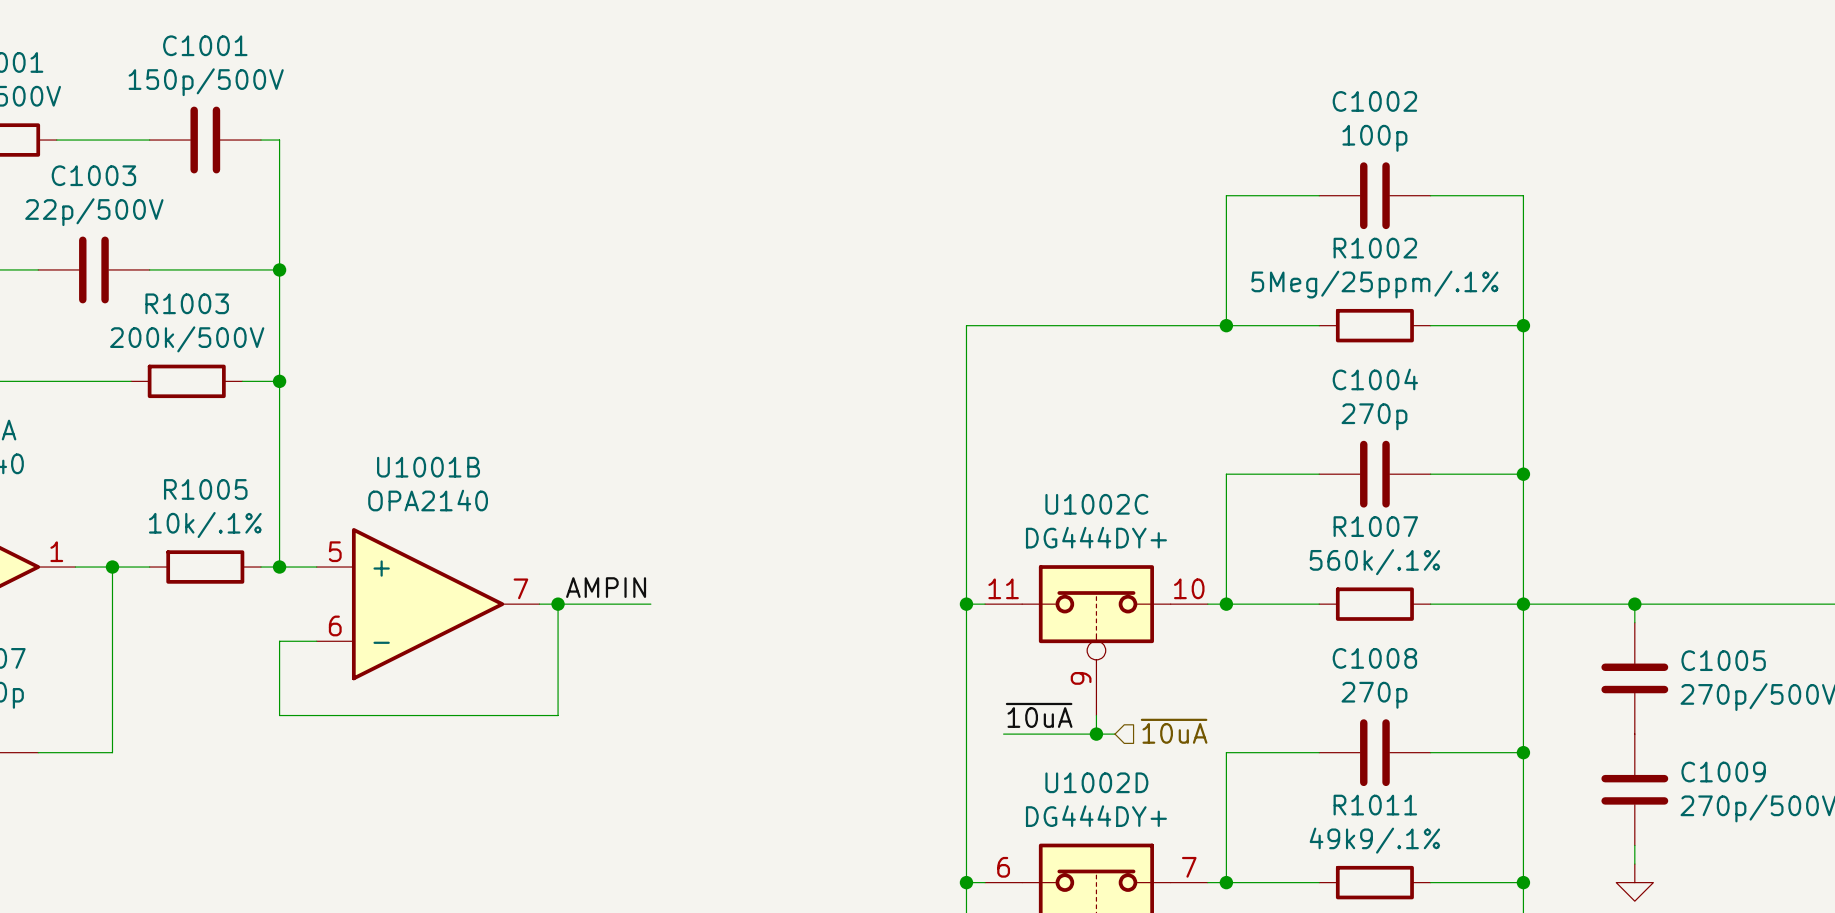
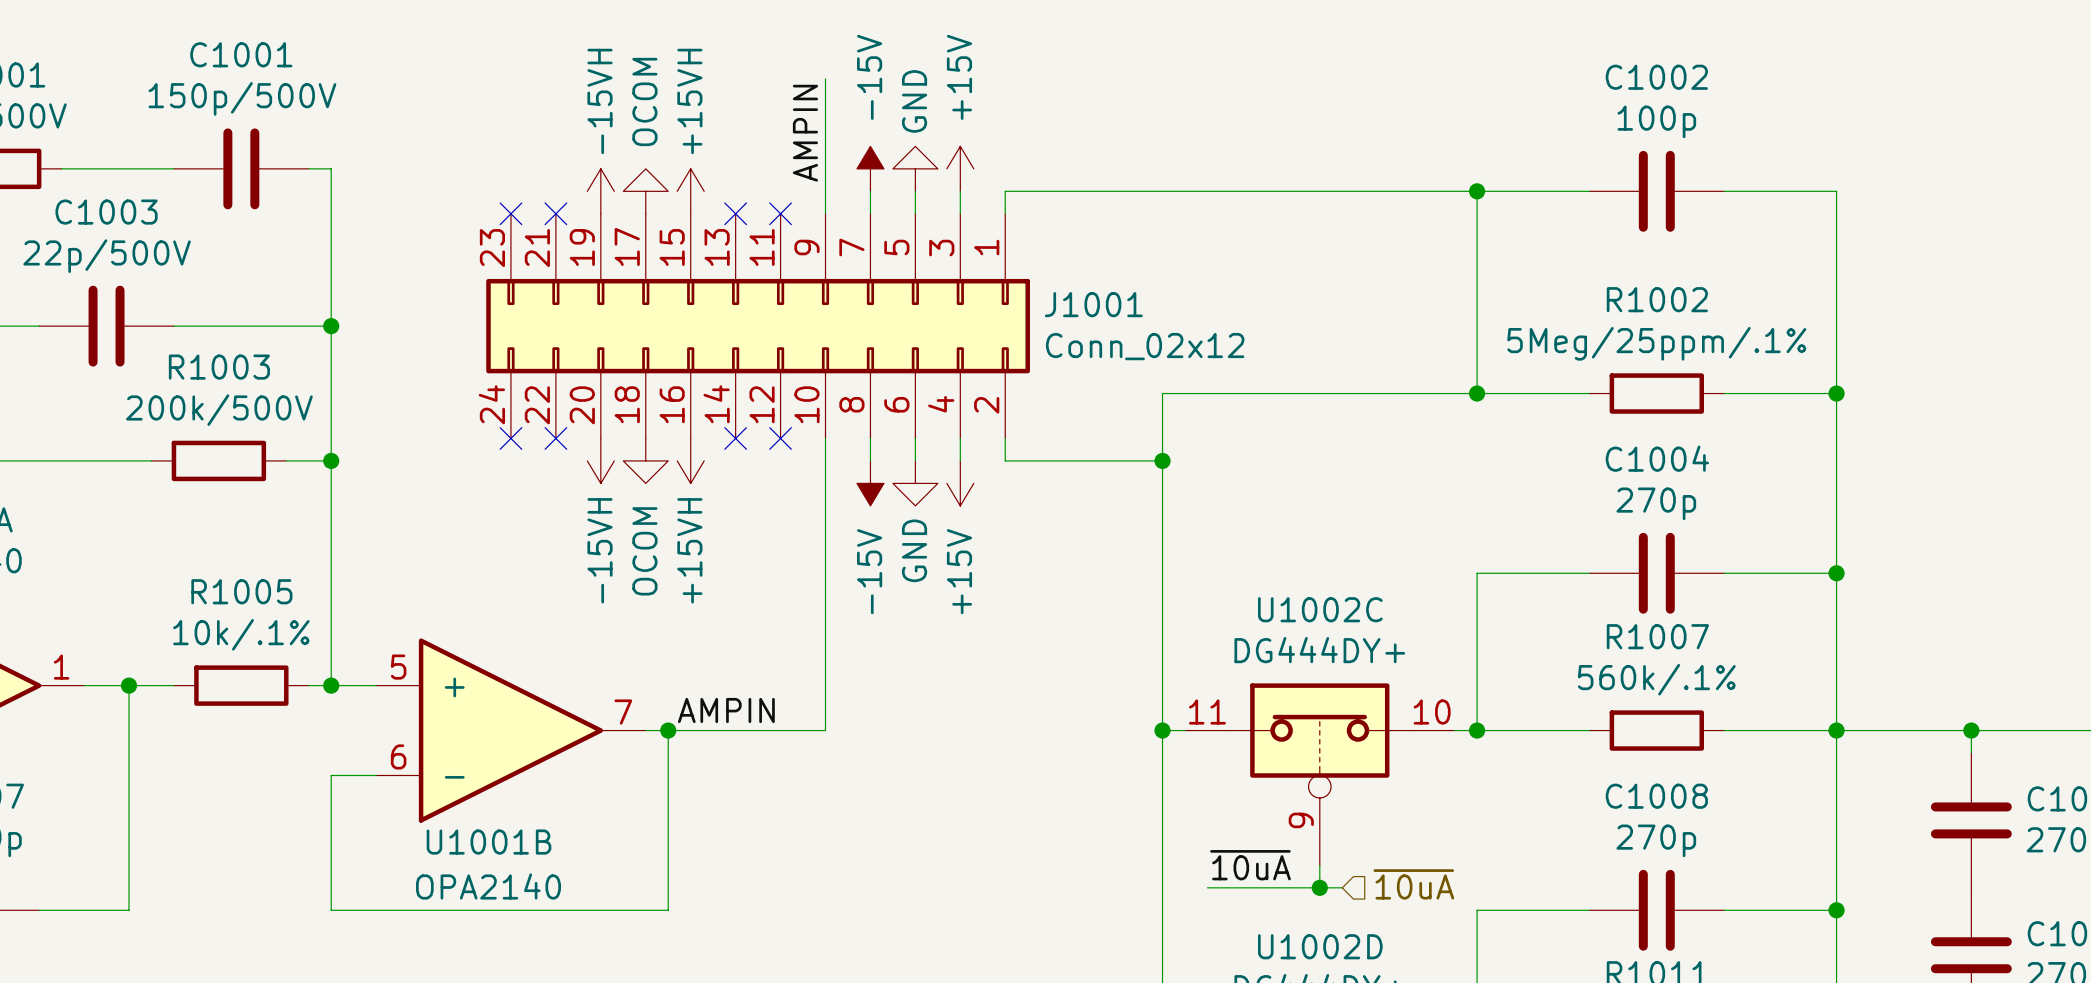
wire: none -> (825, 78) (825, 213)
label: none -> AMPIN (805, 133)
power symbol: none -> -15V (870, 168)
power symbol: none -> GND (915, 168)
power symbol: none -> +15V (960, 168)
power symbol: none -> -15VH (600, 191)
power symbol: none -> OCOM (645, 191)
power symbol: none -> +15VH (690, 191)
wire: none -> (870, 191) (870, 213)
wire: none -> (915, 191) (915, 213)
wire: none -> (960, 191) (960, 213)
junction: none -> (1477, 191)
wire: none -> (1589, 191) (1005, 191) (1005, 213)
no-connect mark: none -> (510, 213)
no-connect mark: none -> (555, 213)
no-connect mark: none -> (735, 213)
no-connect mark: none -> (780, 213)
wire: (1226, 195) (1319, 195) -> (1477, 236) (1477, 191)
C1002 position: (1374, 195) -> (1656, 191)
wire: (1430, 195) (1523, 195) -> (1724, 191) (1836, 191) (1836, 236)
J1001: none -> Conn_02x12 (758, 326)
no-connect mark: none -> (510, 438)
no-connect mark: none -> (555, 438)
no-connect mark: none -> (735, 438)
no-connect mark: none -> (780, 438)
wire: none -> (825, 438) (825, 730) (780, 730)
wire: none -> (870, 438) (870, 460)
wire: none -> (915, 438) (915, 460)
wire: none -> (960, 438) (960, 460)
wire: none -> (1005, 438) (1005, 460) (1162, 460)
power symbol: none -> -15VH (600, 460)
power symbol: none -> OCOM (645, 460)
power symbol: none -> +15VH (690, 460)
junction: none -> (1162, 460)
power symbol: none -> -15V (870, 483)
power symbol: none -> GND (915, 483)
power symbol: none -> +15V (960, 483)
U1001B name position: U1001B (428, 467) -> U1001B (489, 842)
U1001B value position: OPA2140 (428, 500) -> OPA2140 (488, 886)
wire: (279, 715) (558, 715) -> (331, 865) (331, 910) (668, 910) (668, 865)

